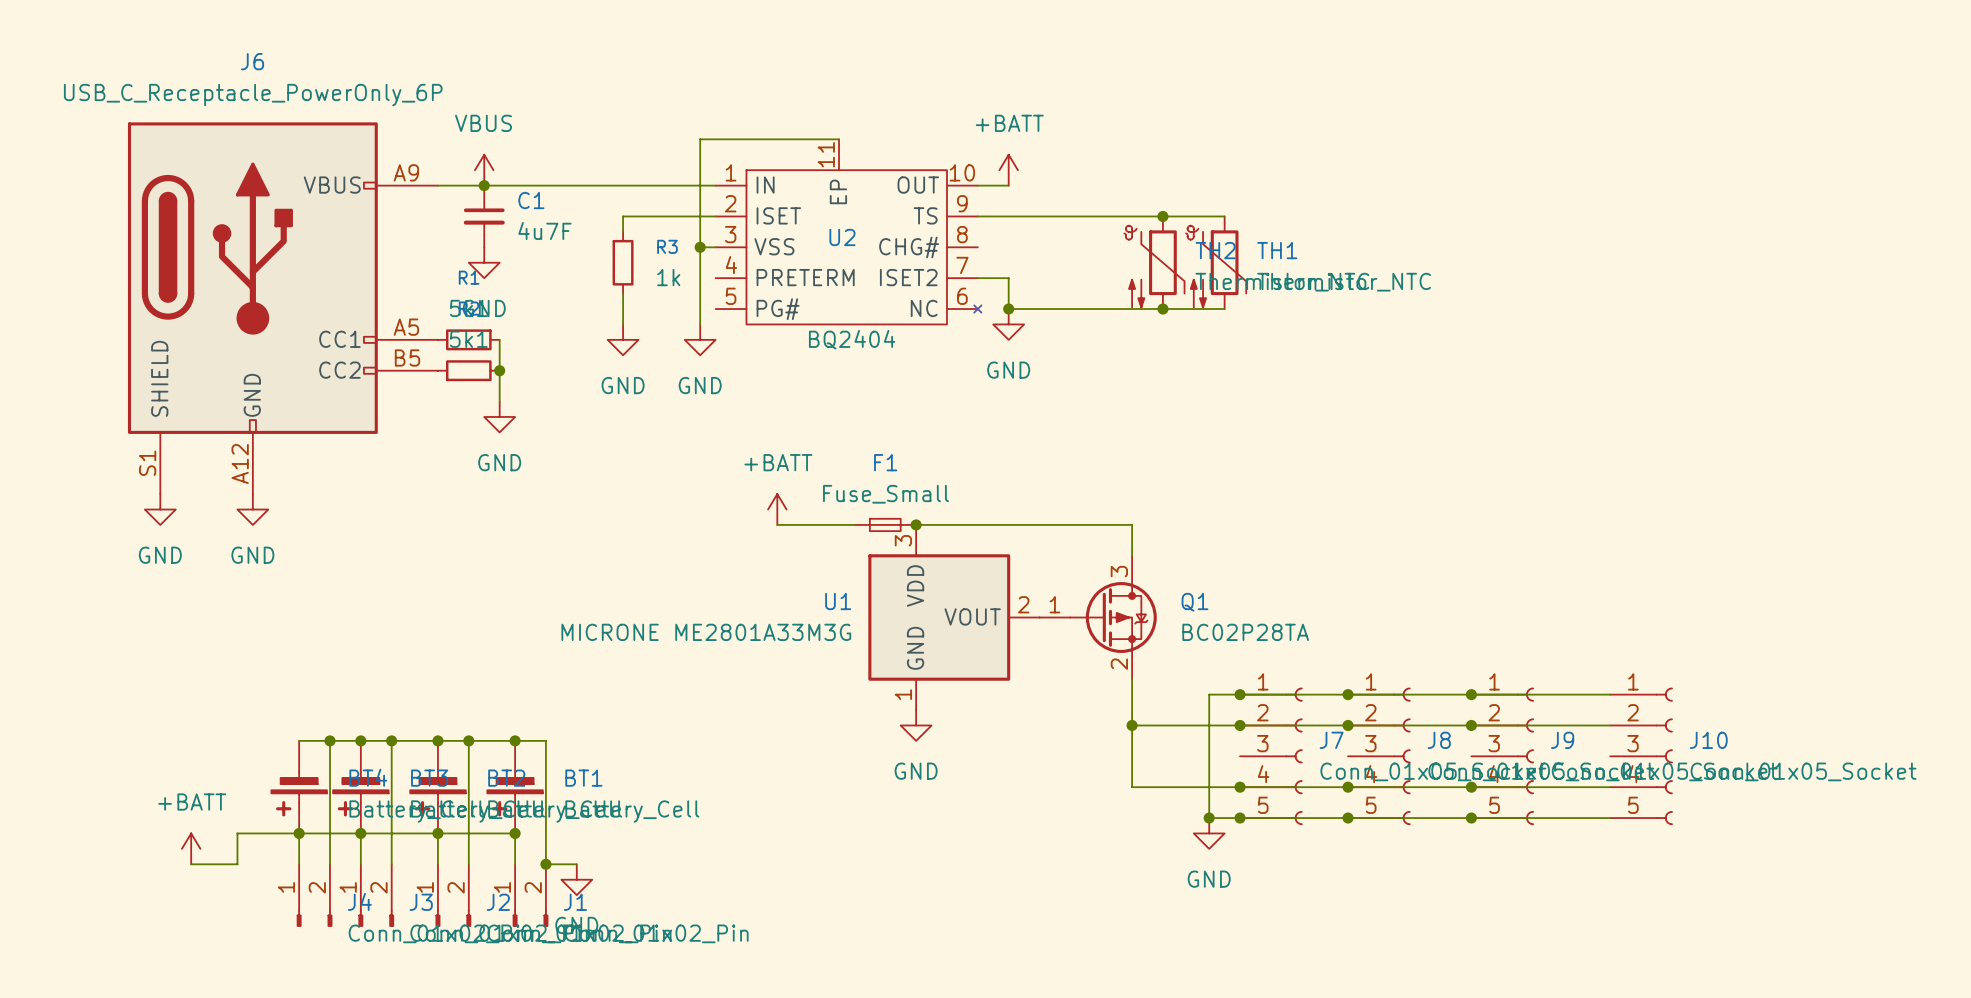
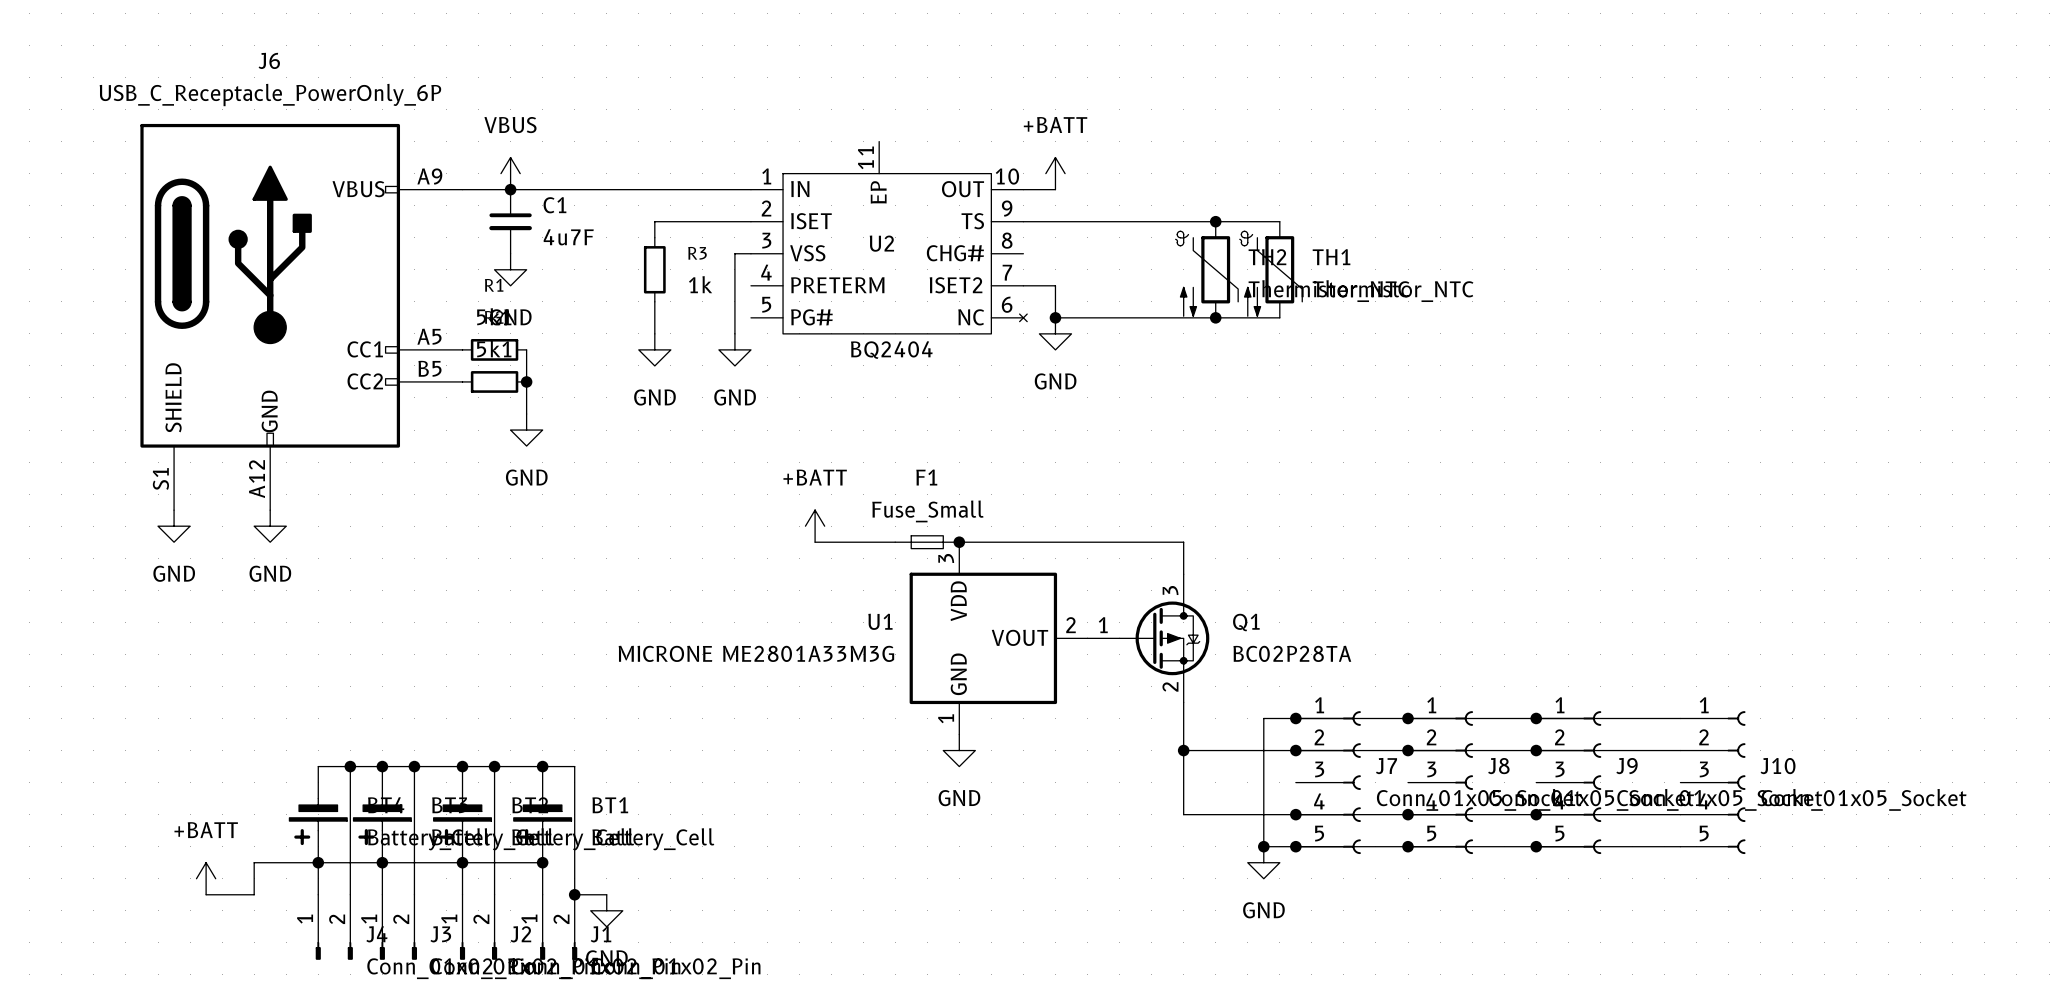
wire: (839, 139) (700, 139) (700, 247) -> none
junction: (700, 247) -> none

